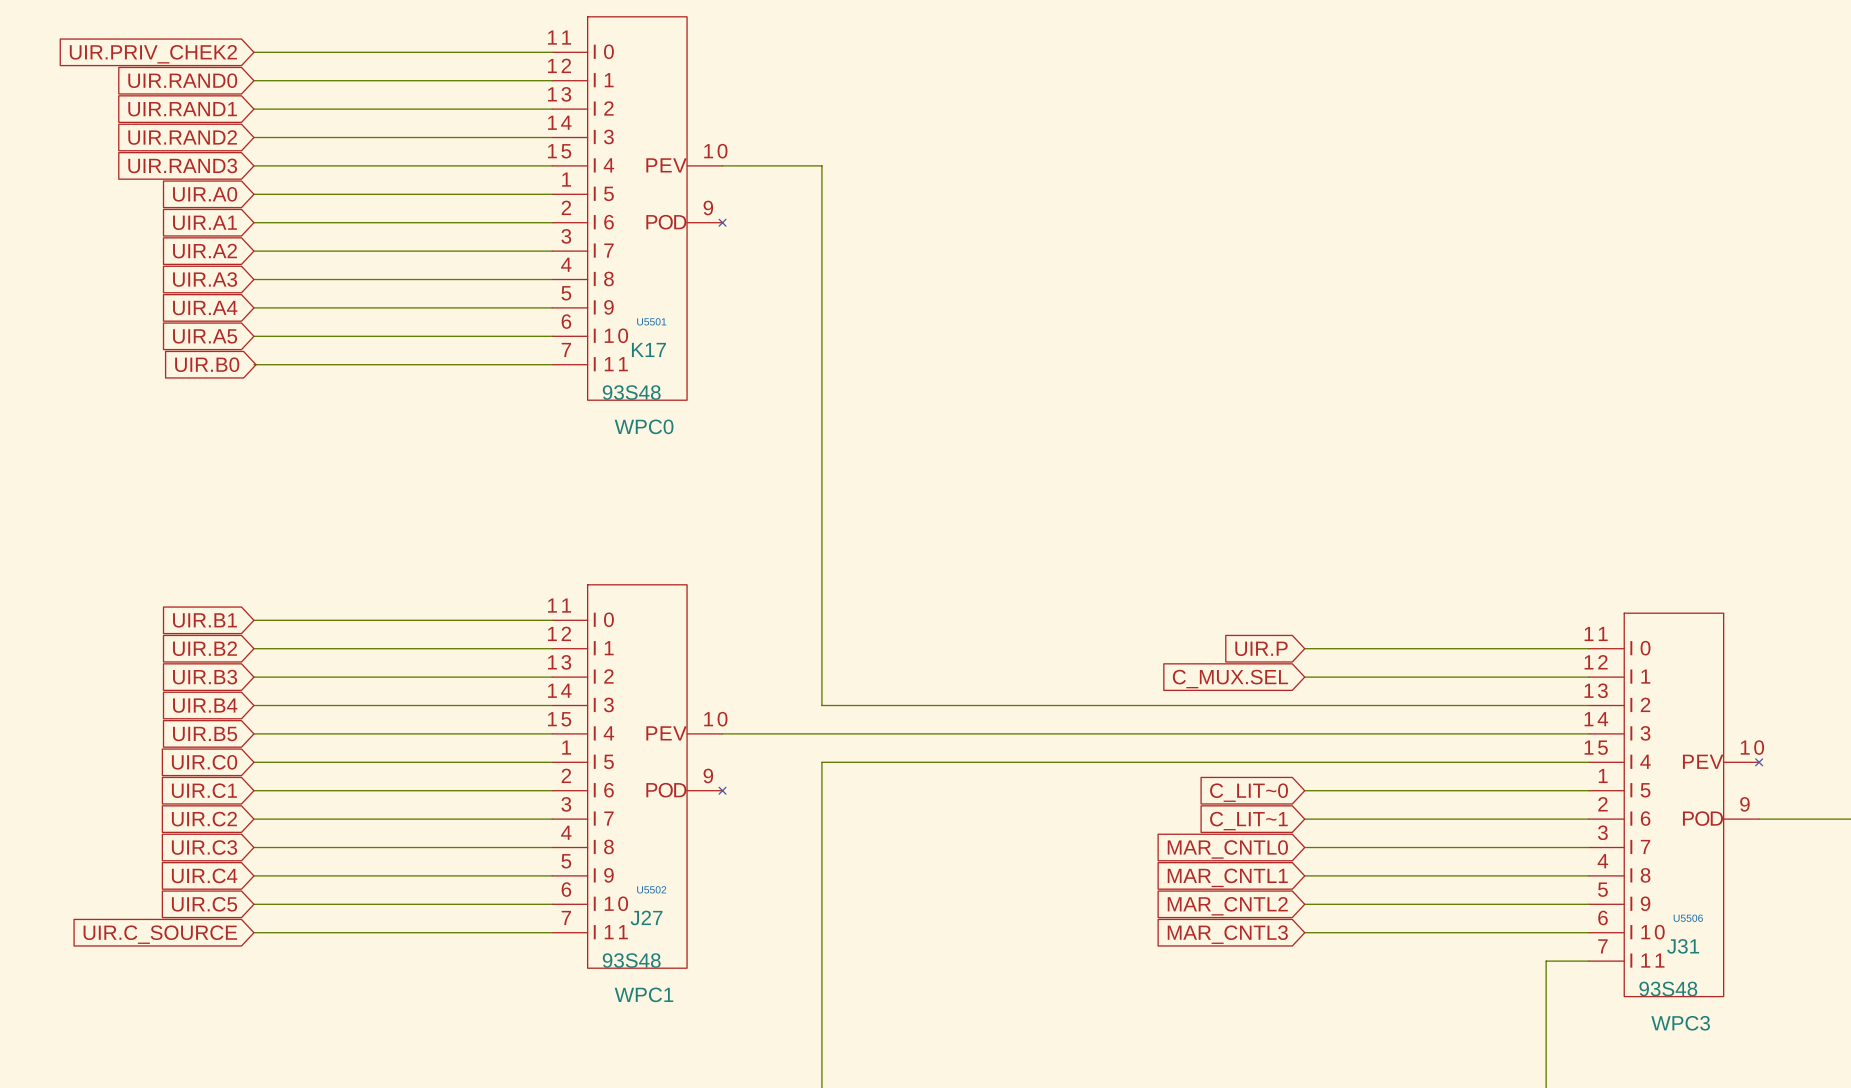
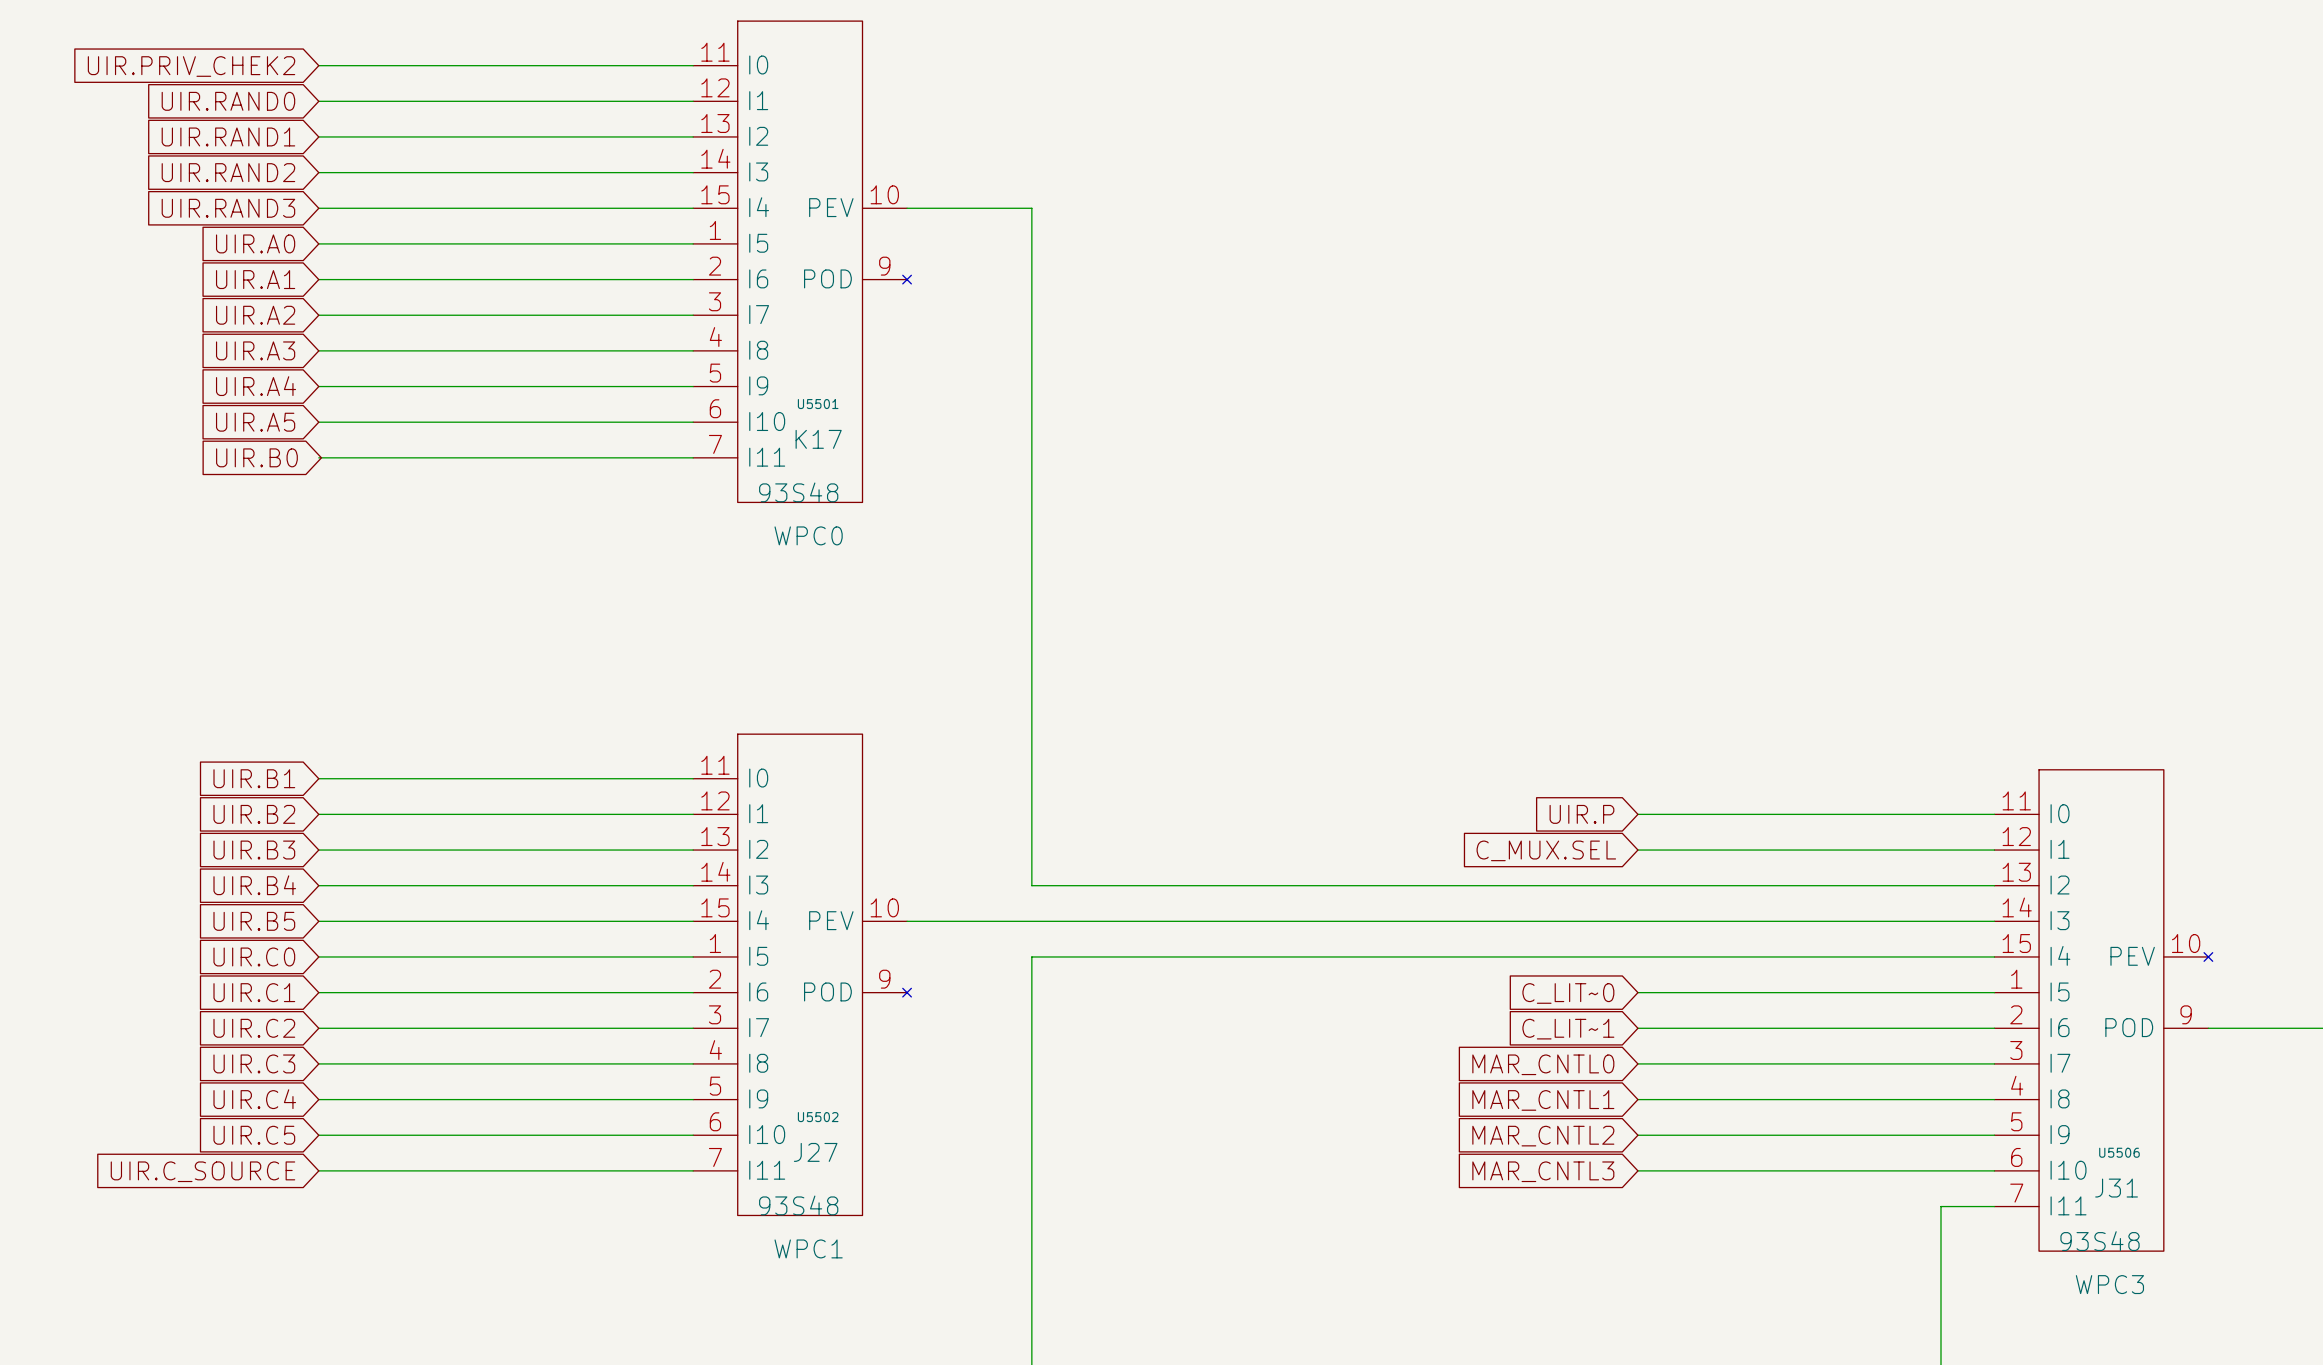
U5501 symbol: [552, 16, 723, 401] -> [693, 21, 908, 503]
U5502 symbol: [552, 584, 723, 969] -> [693, 734, 908, 1216]
U5506 symbol: [1588, 613, 1760, 997] -> [1994, 769, 2209, 1252]

